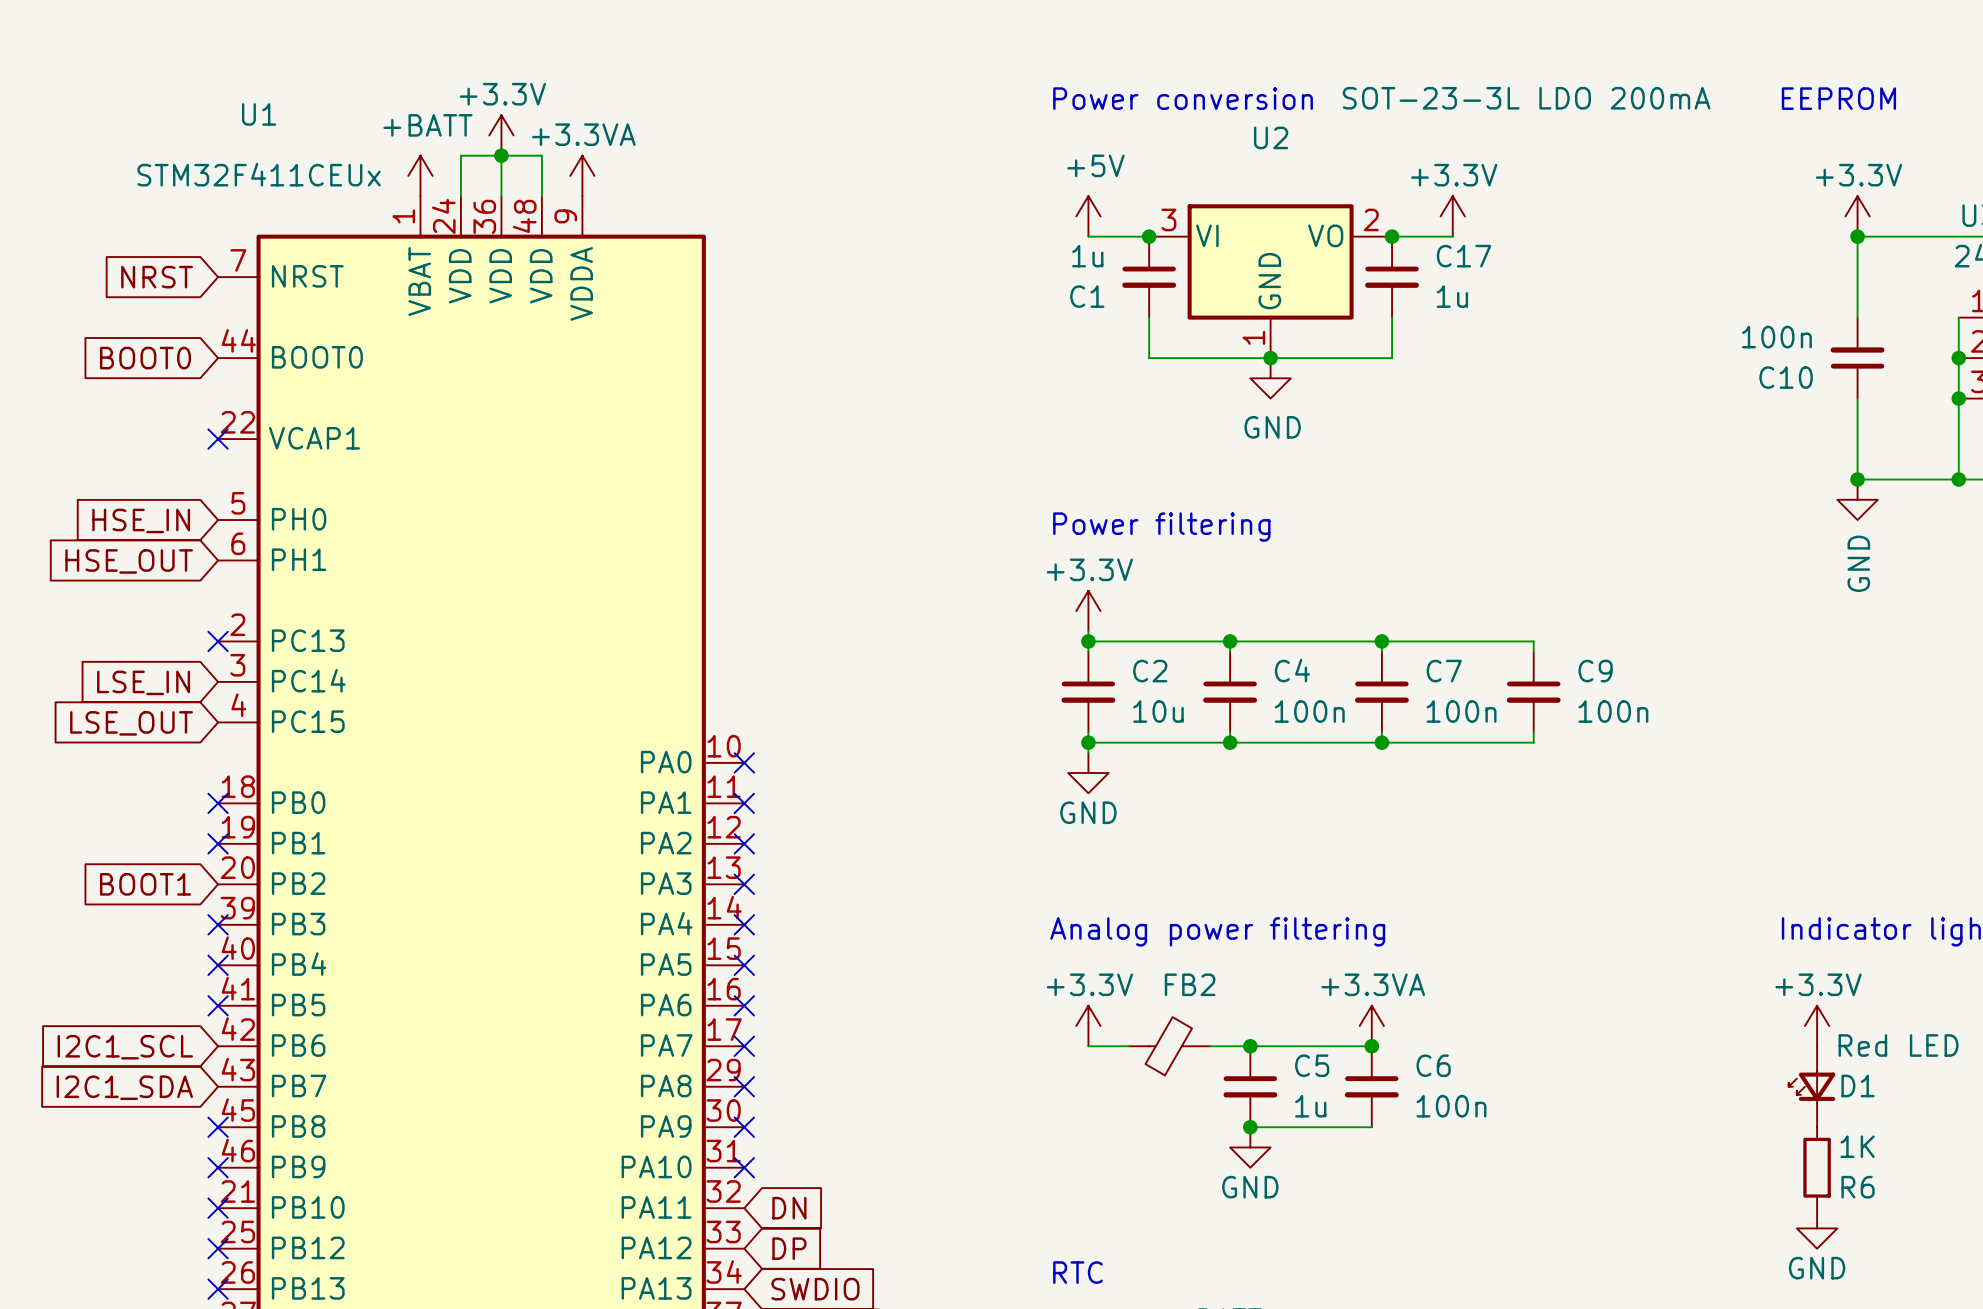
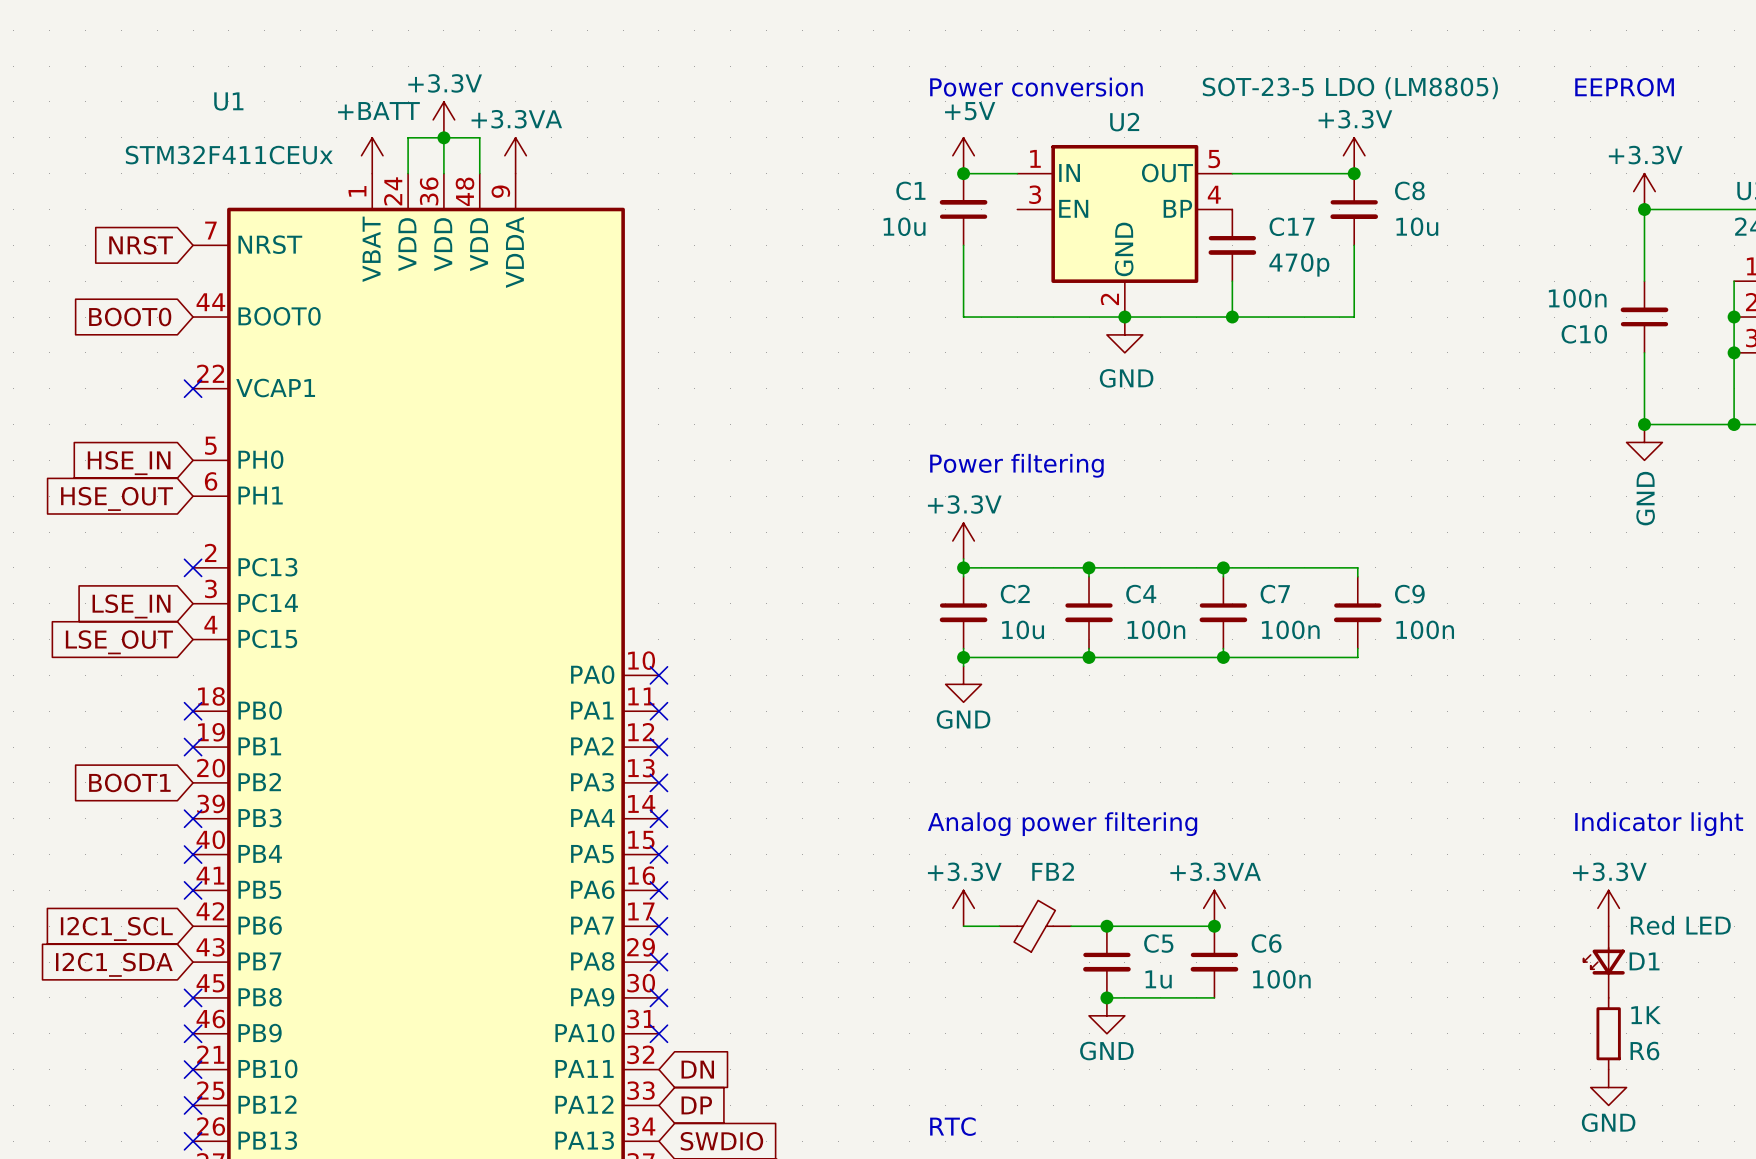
U2 value: SOT-23-3L LDO 200mA (1526, 98) -> SOT-23-5 LDO (LM8805) (1350, 88)
wire: none -> (1232, 173) (1354, 173)
junction: none -> (1354, 173)
U2 symbol: [1149, 204, 1393, 359] -> [1017, 144, 1233, 318]
power symbol position: +5V (1088, 216) -> +5V (963, 155)
power symbol position: +3.3V (1452, 216) -> +3.3V (1354, 155)
wire: (1088, 236) (1149, 236) -> (963, 173) (1017, 173)
junction position: (1149, 236) -> (963, 173)
wire: (1392, 236) (1452, 236) -> none
junction: (1392, 236) -> none
C8: none -> 10u (1354, 209)
C1 value: 1u (1087, 256) -> 10u (904, 226)
C1 rotation: 0° (1149, 277) -> 180° (963, 209)
C1 position: (1149, 277) -> (963, 209)
wire: none -> (1354, 245) (1354, 317) (1232, 317)
C1 name position: C1 (1087, 296) -> C1 (910, 190)
C17 value: 1u (1452, 296) -> 470p (1299, 264)
wire: (1149, 317) (1149, 358) -> (963, 245) (963, 317) (1017, 317)
junction: none -> (1232, 317)

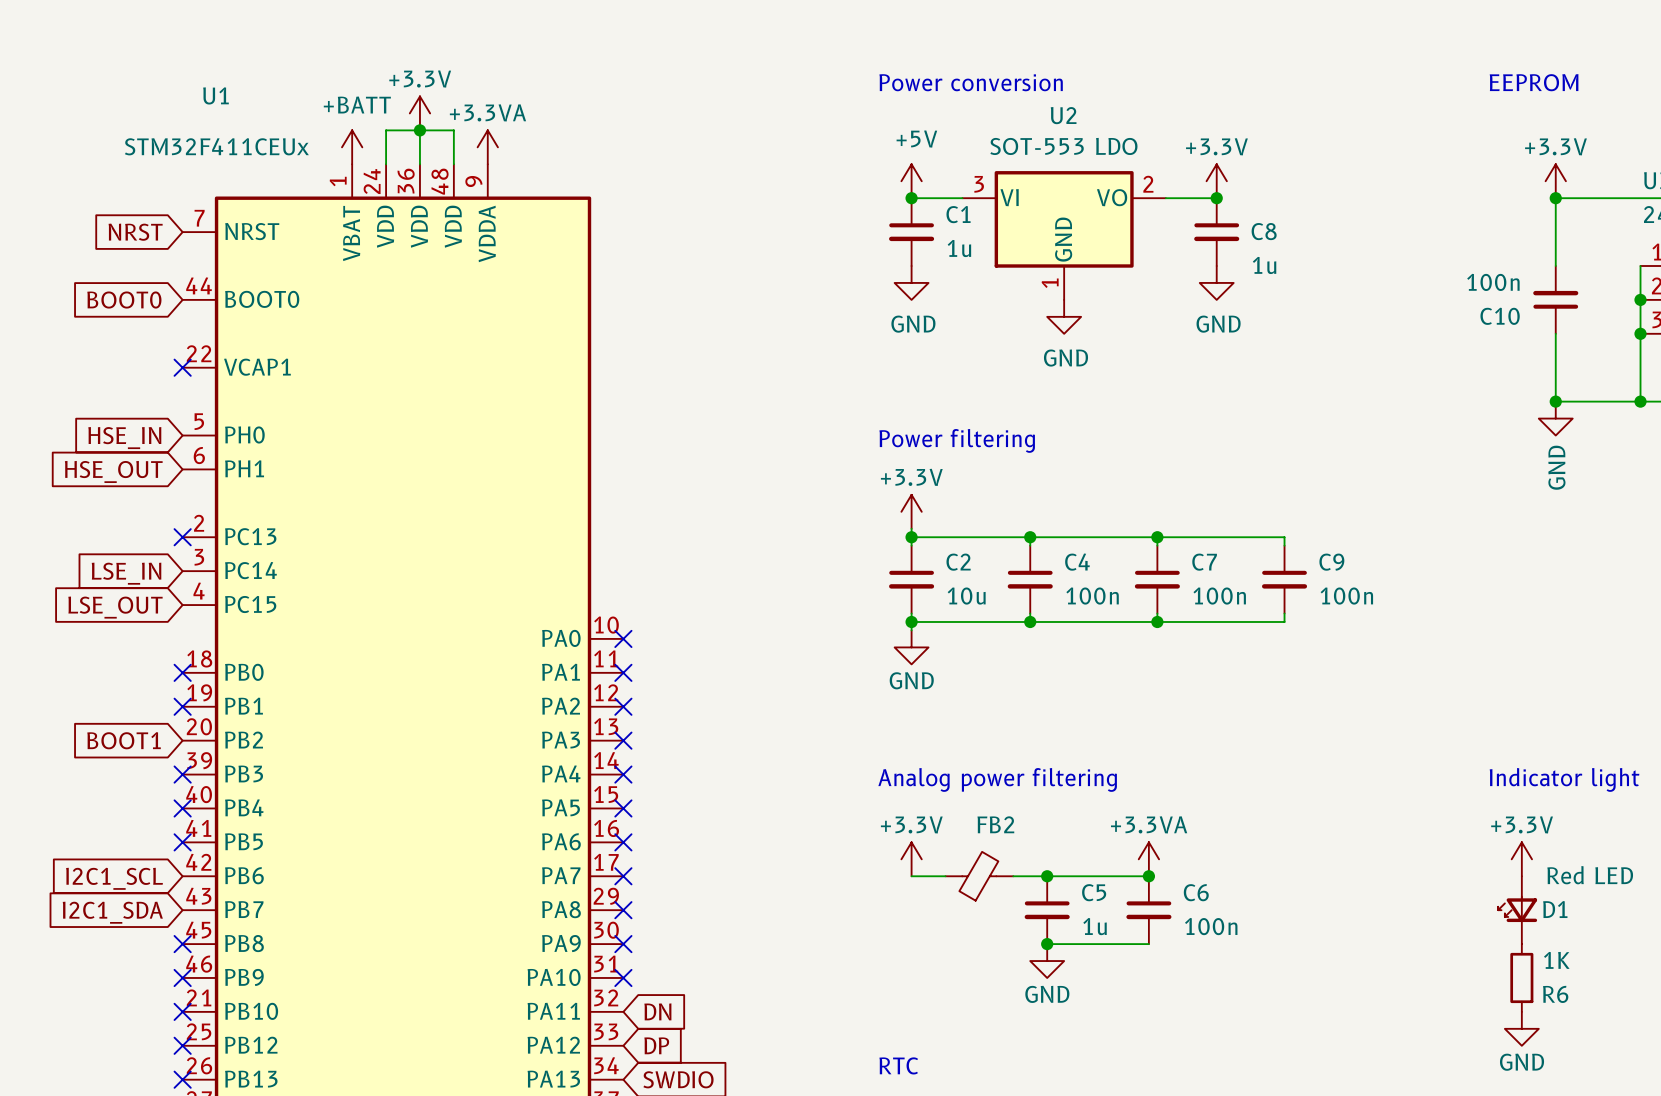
U2 value: SOT-23-5 LDO (LM8805) (1350, 88) -> SOT-553 LDO (1063, 146)
U2 symbol: [1017, 144, 1233, 318] -> [962, 171, 1166, 300]
power symbol position: +5V (963, 155) -> +5V (911, 181)
power symbol position: +3.3V (1354, 155) -> +3.3V (1216, 181)
wire: (963, 173) (1017, 173) -> (911, 198) (962, 198)
junction position: (963, 173) -> (911, 198)
wire: (1232, 173) (1354, 173) -> none
junction: (1354, 173) -> none
C1 name position: C1 (910, 190) -> C1 (958, 214)
C8 name position: C8 (1409, 190) -> C8 (1264, 231)
C1 rotation: 0° (963, 209) -> 180° (911, 232)
wire: none -> (1165, 198) (1216, 198)
junction: none -> (1216, 198)
C8 position: (1354, 209) -> (1216, 232)
C1 value: 10u (904, 226) -> 1u (959, 248)
C8 value: 10u (1417, 226) -> 1u (1264, 265)
wire: (963, 245) (963, 317) (1354, 317) (1354, 245) -> none
C17: 470p (1232, 245) -> none
wire: (1232, 281) (1232, 317) -> none
power symbol: none -> GND (911, 282)
power symbol: none -> GND (1216, 282)
junction: (1124, 317) -> none
junction: (1232, 317) -> none

